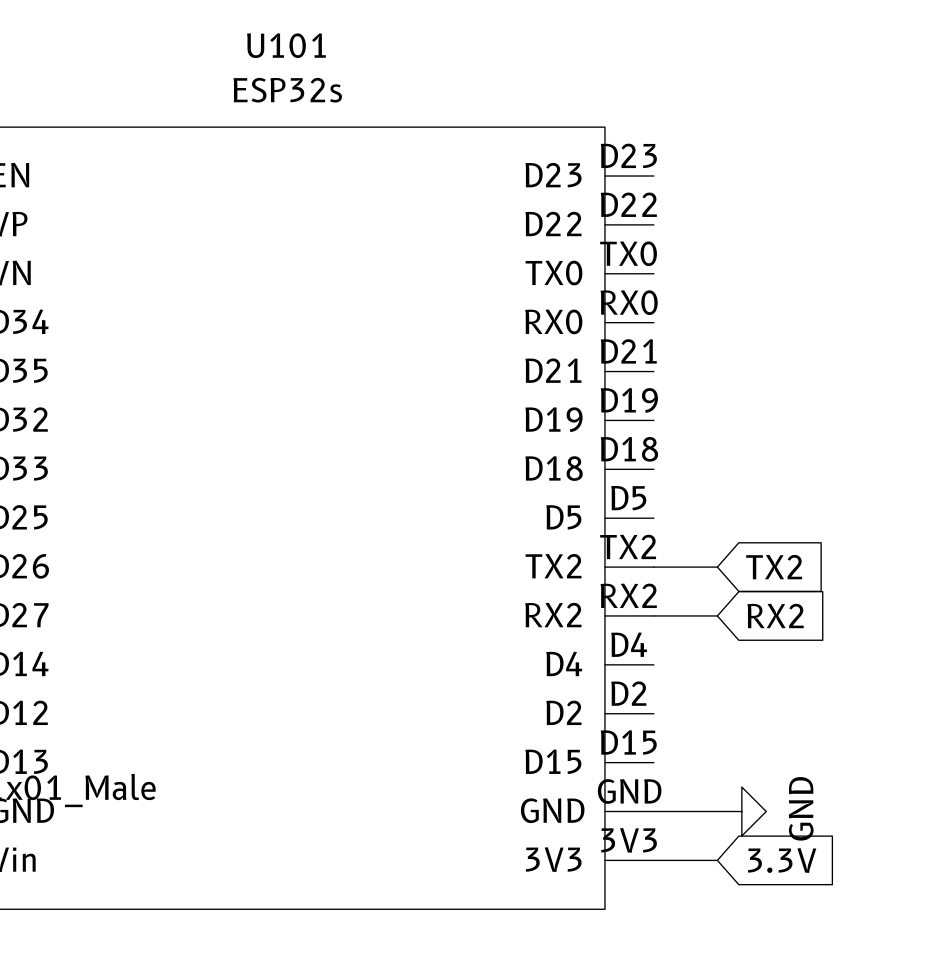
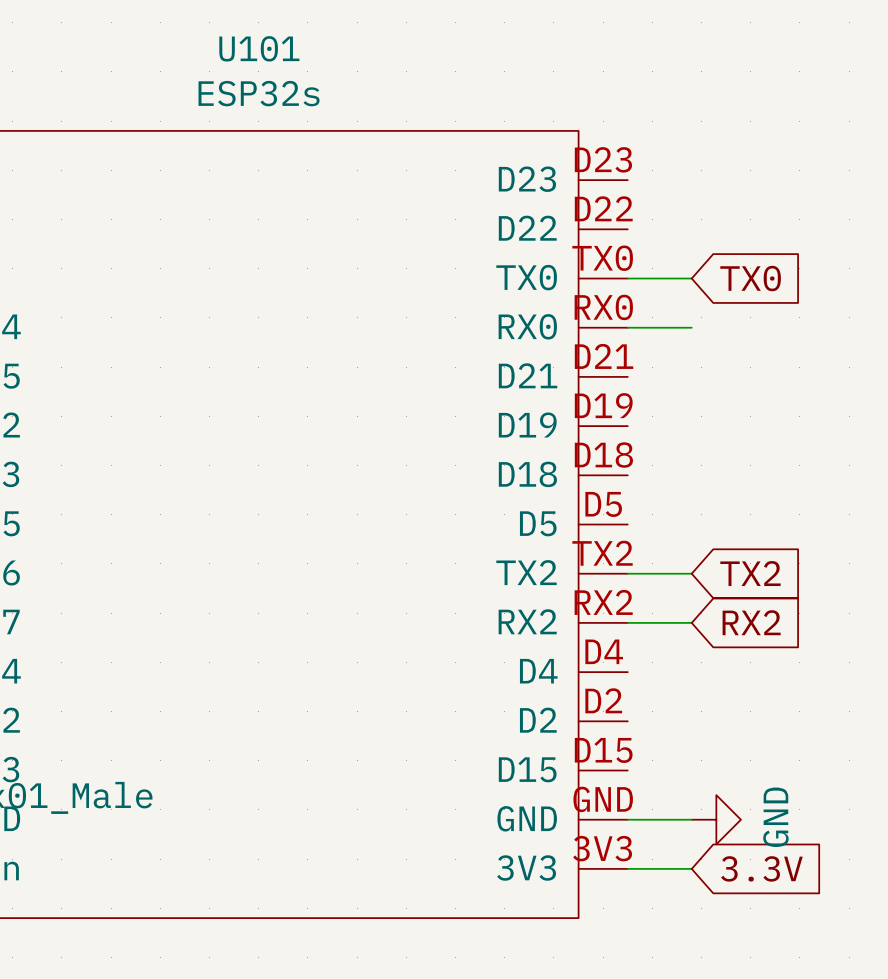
wire: none -> (627, 278) (691, 278)
global label: none -> TX0 (750, 278)
wire: none -> (627, 327) (691, 327)

